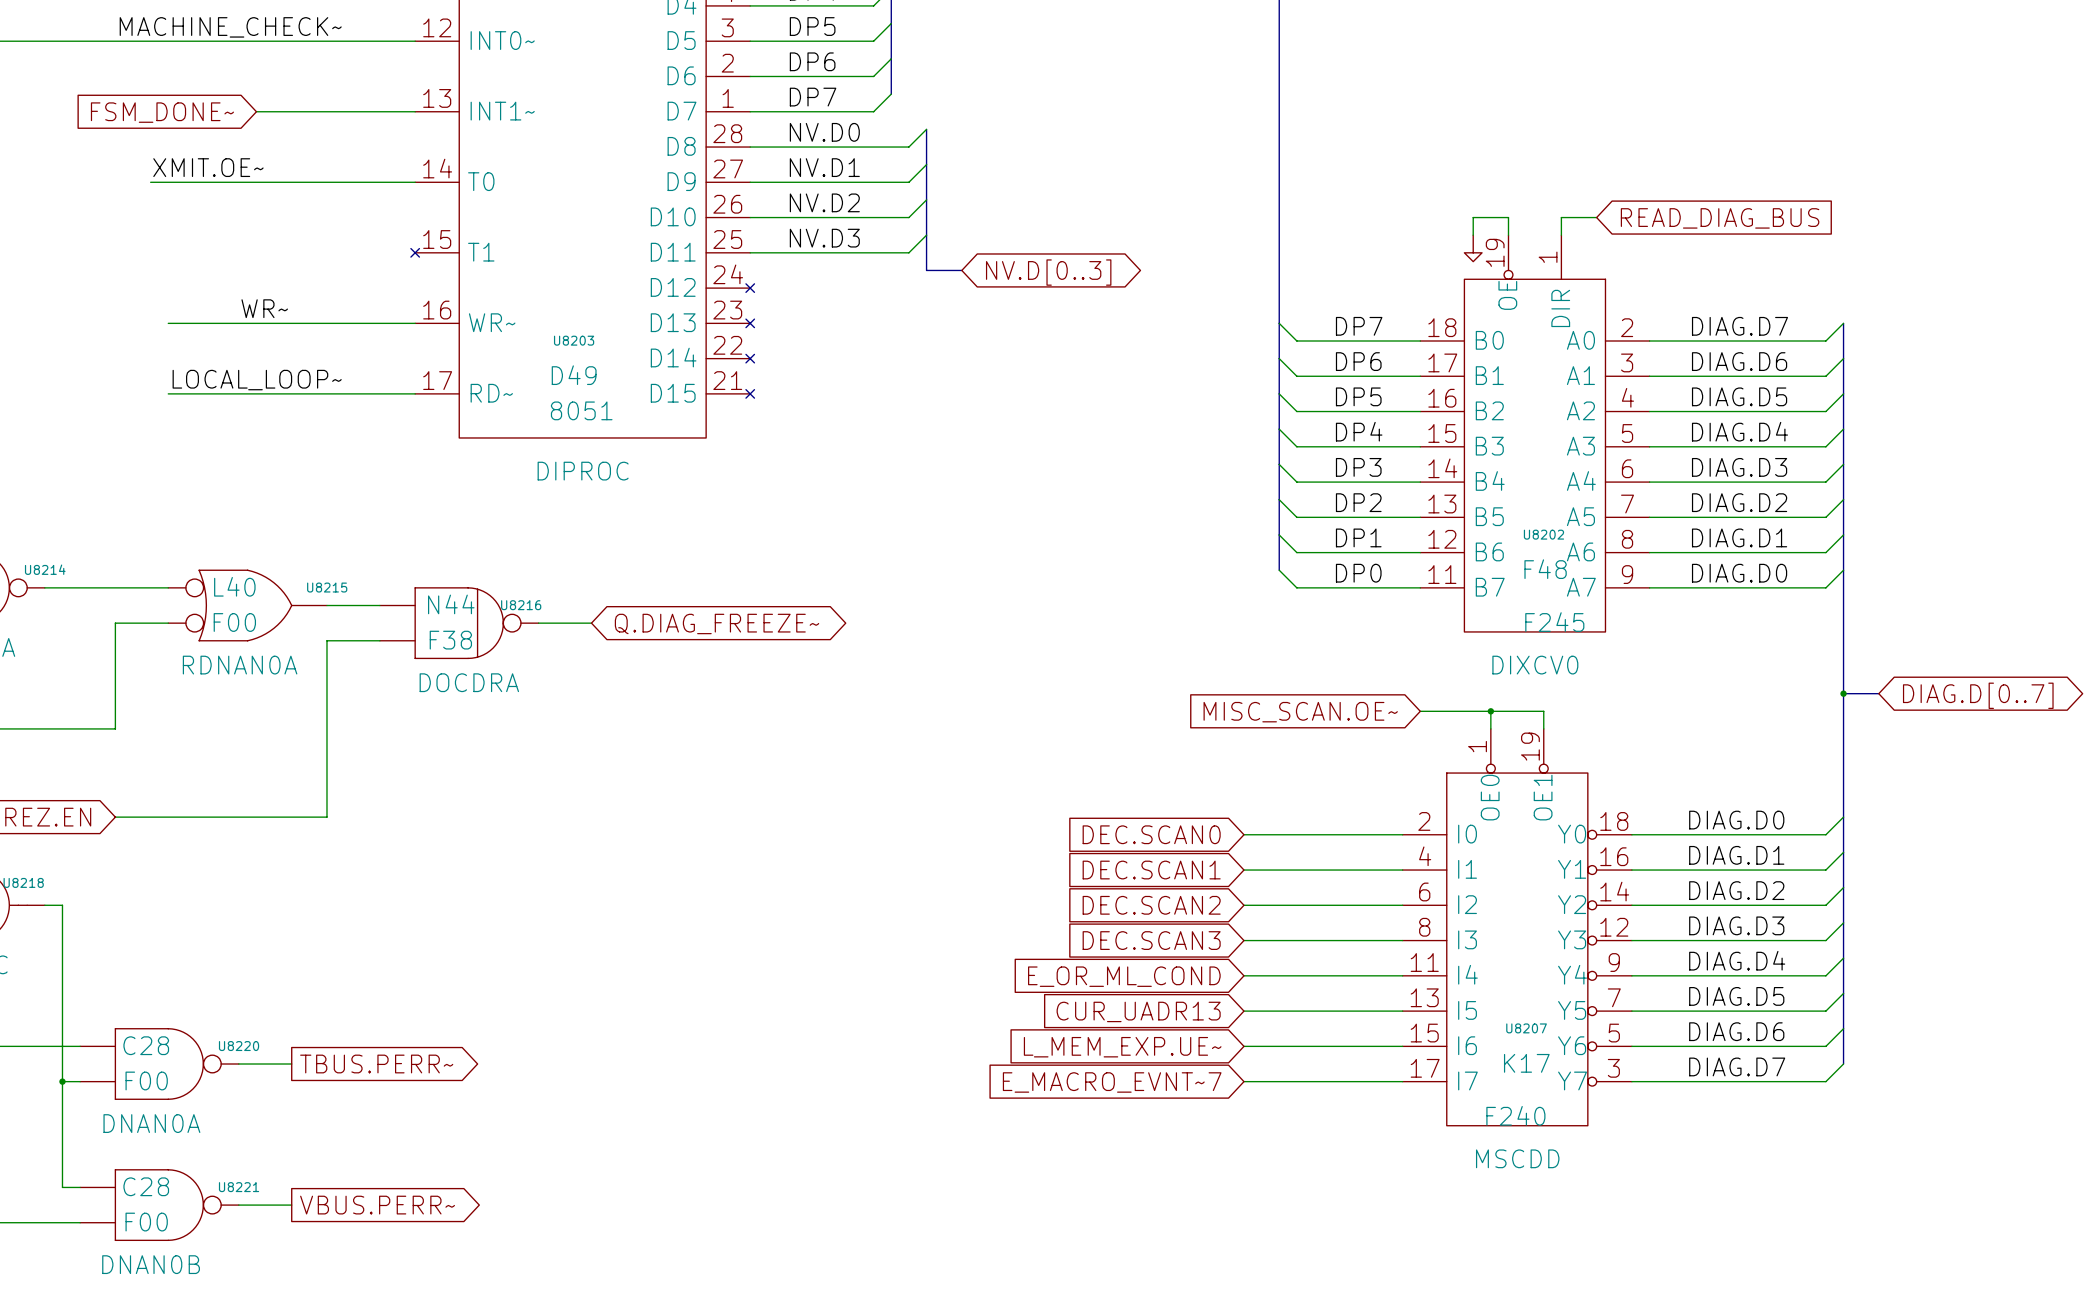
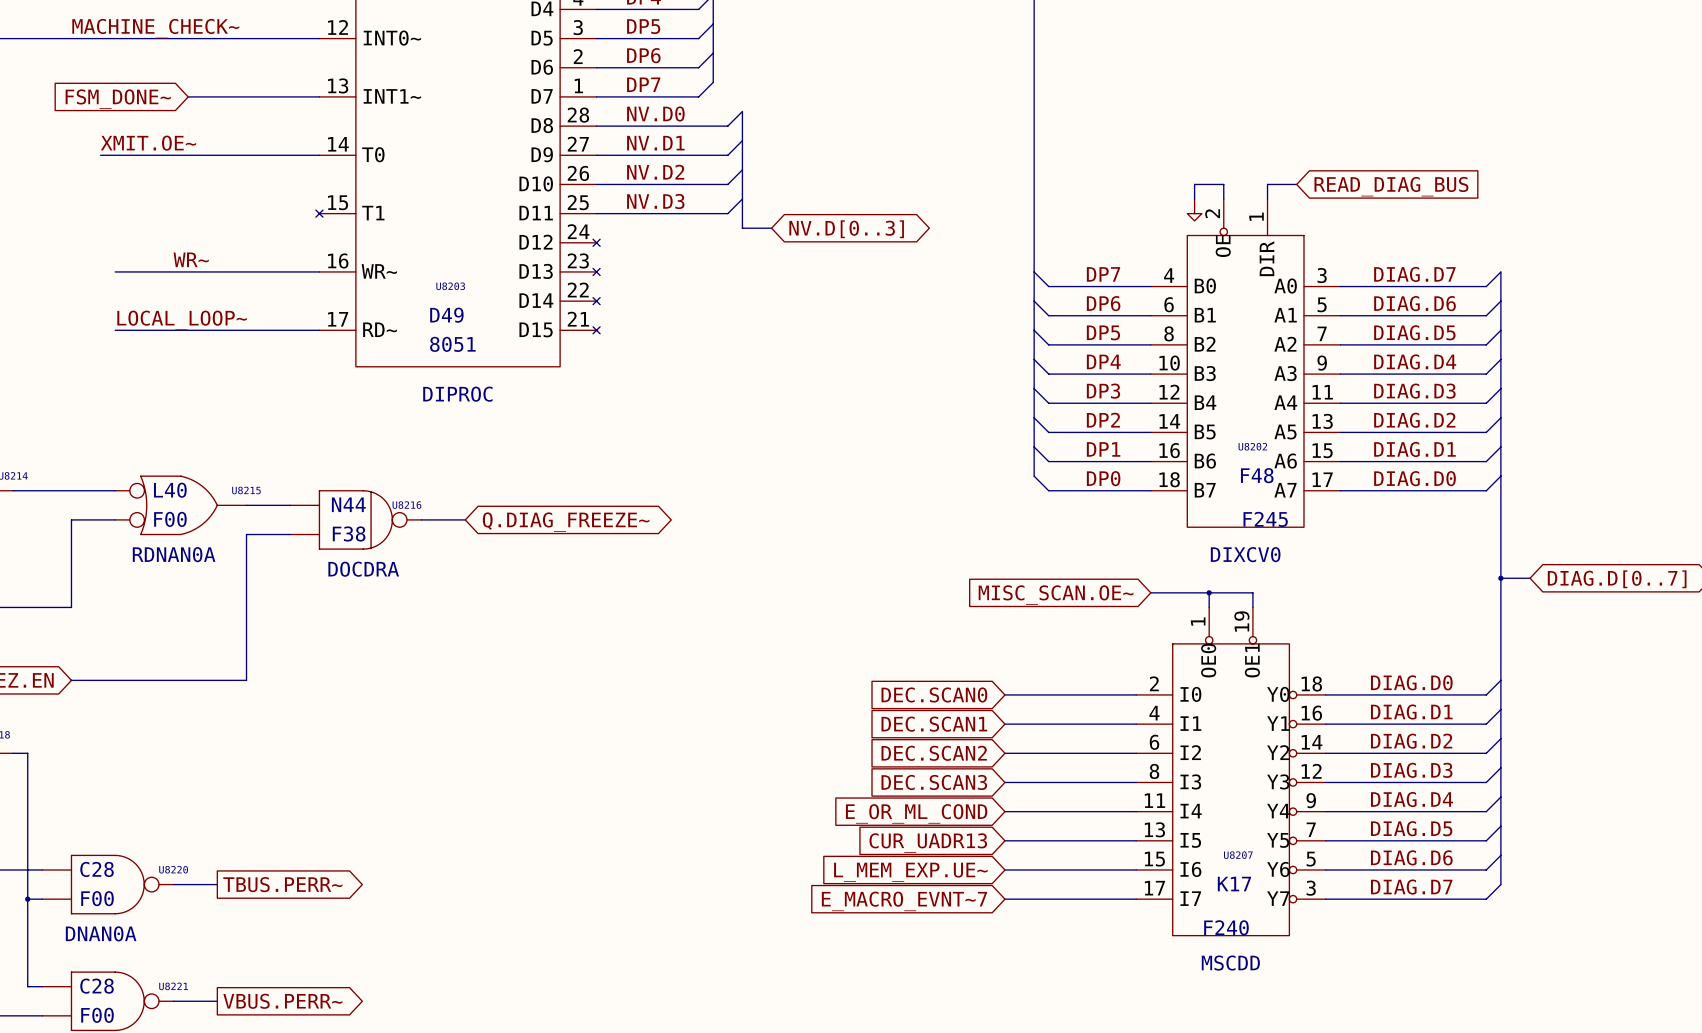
U8202 symbol: [1420, 235, 1650, 632] -> [1150, 199, 1341, 528]

